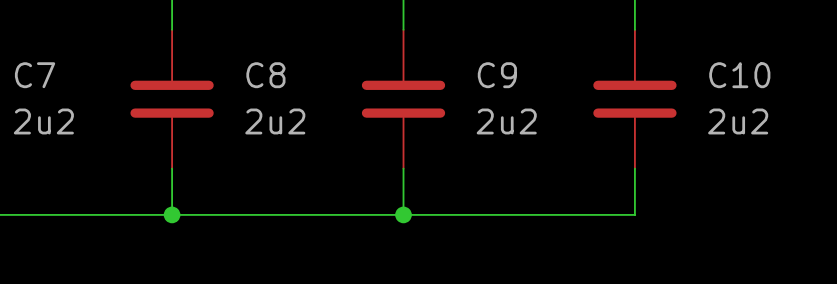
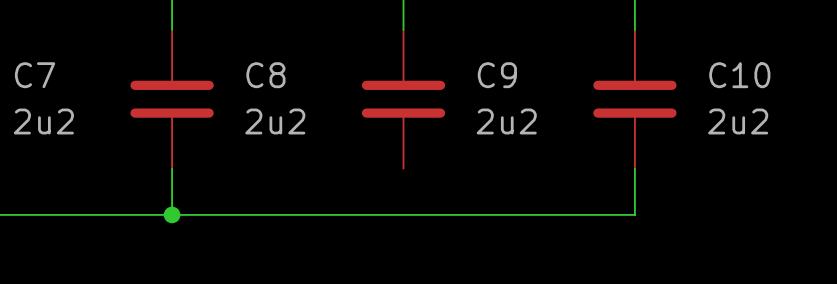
wire: (403, 168) (403, 214) -> none
junction: (403, 214) -> none

